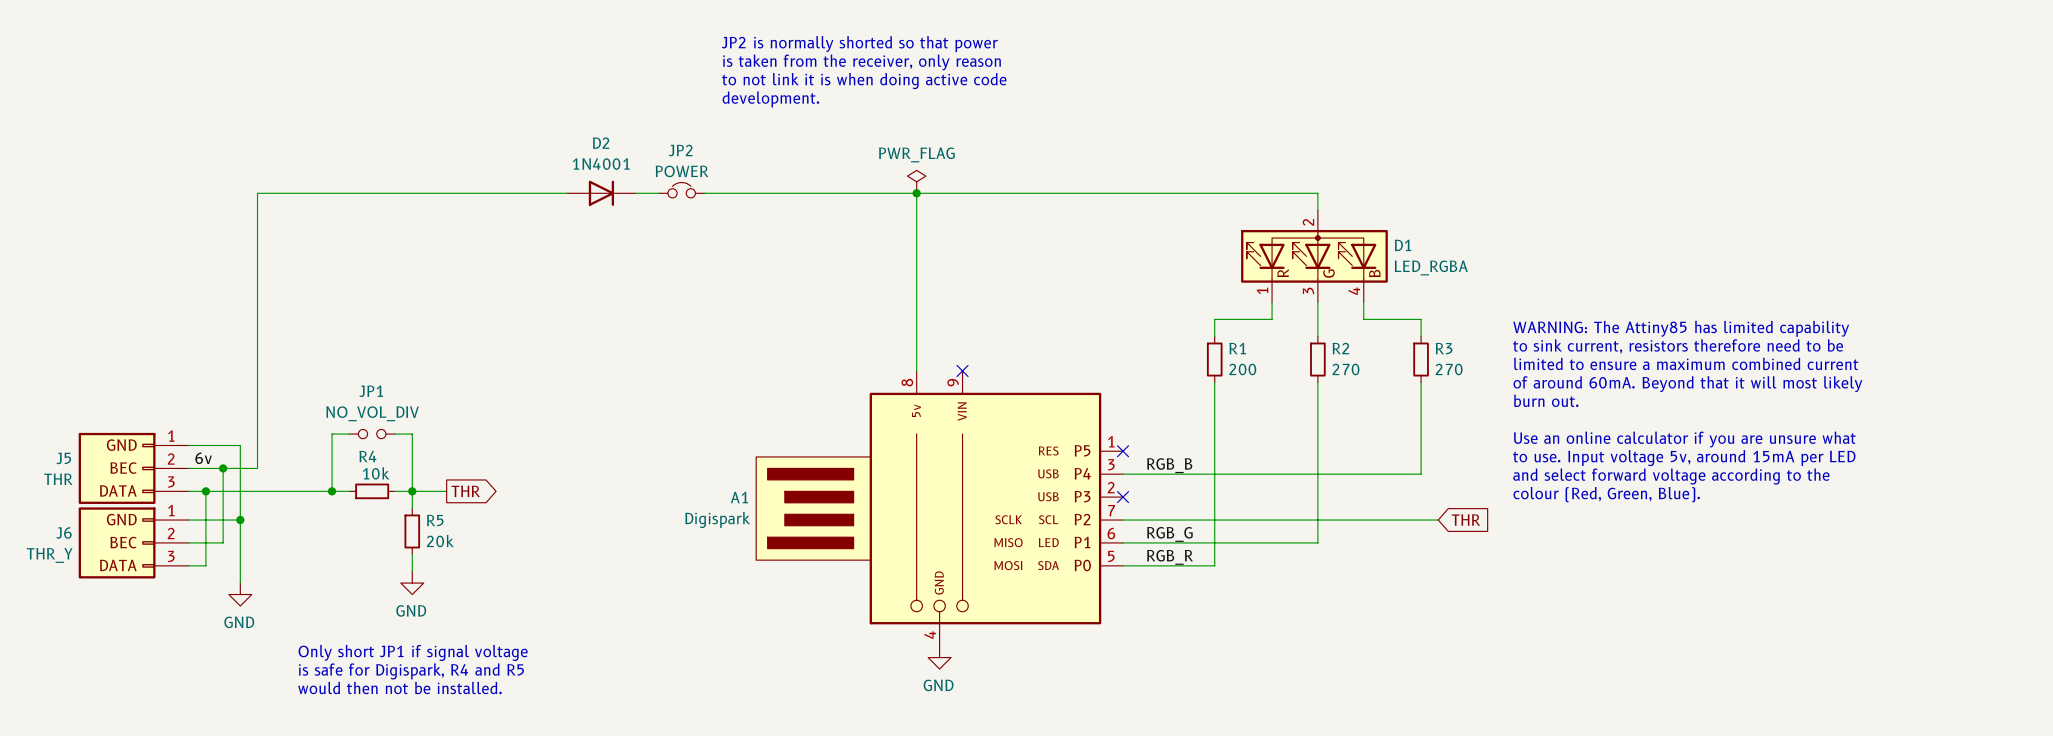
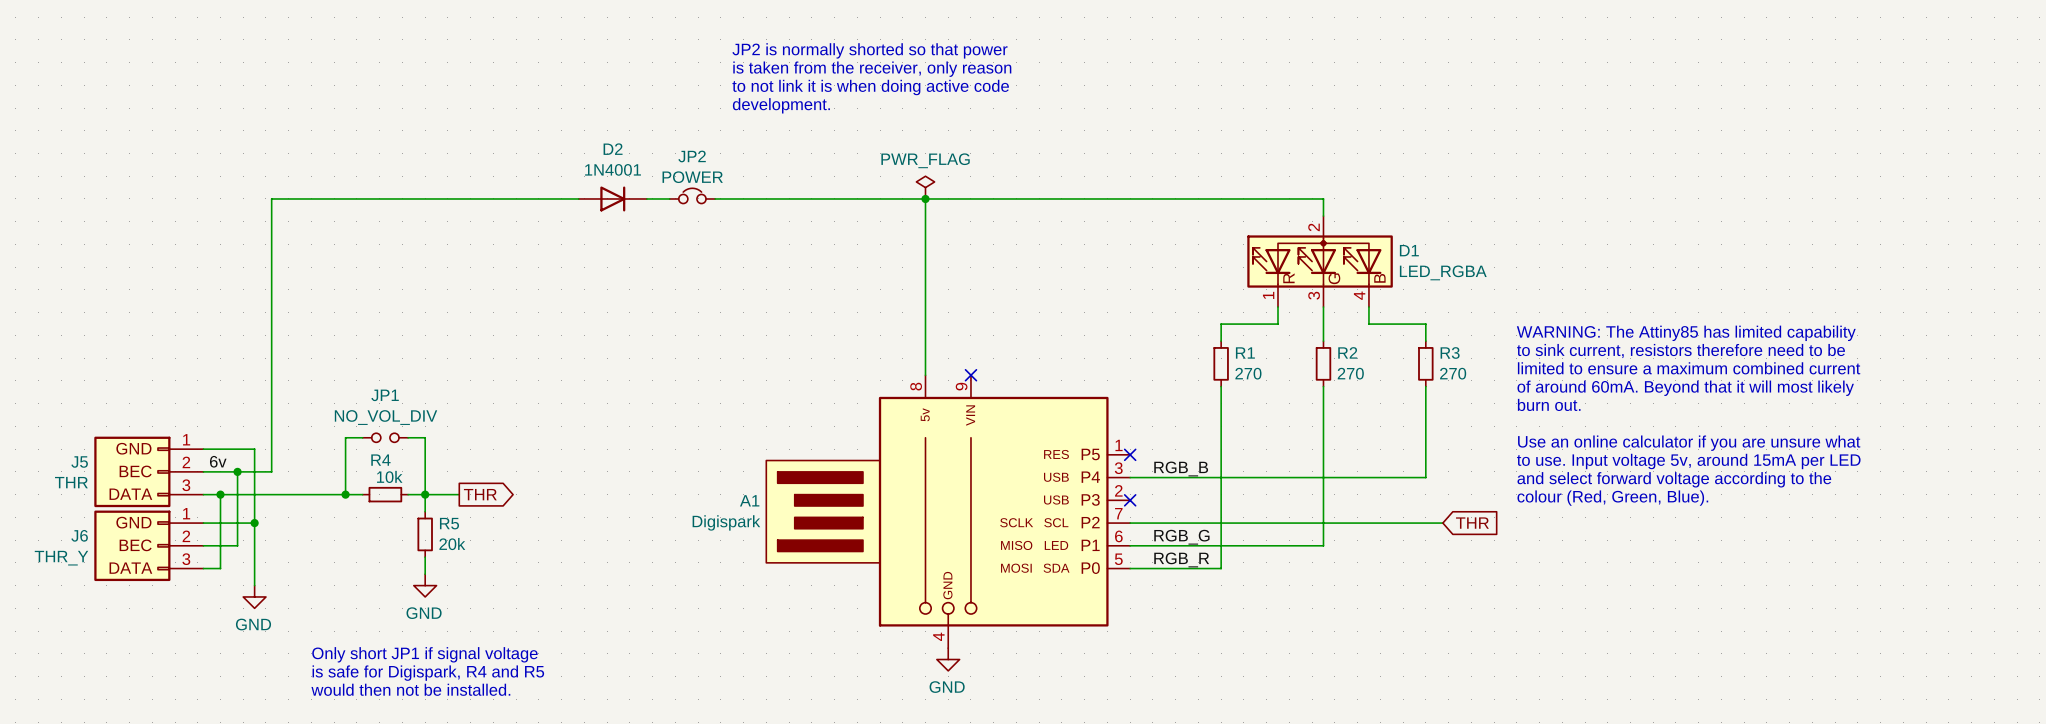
R1 value: 200 (1242, 369) -> 270 (1248, 373)

